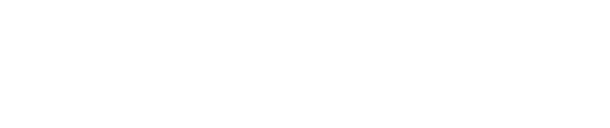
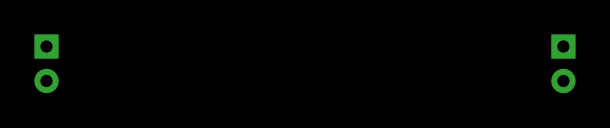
part: none -> (46, 63)
part: none -> (563, 63)

